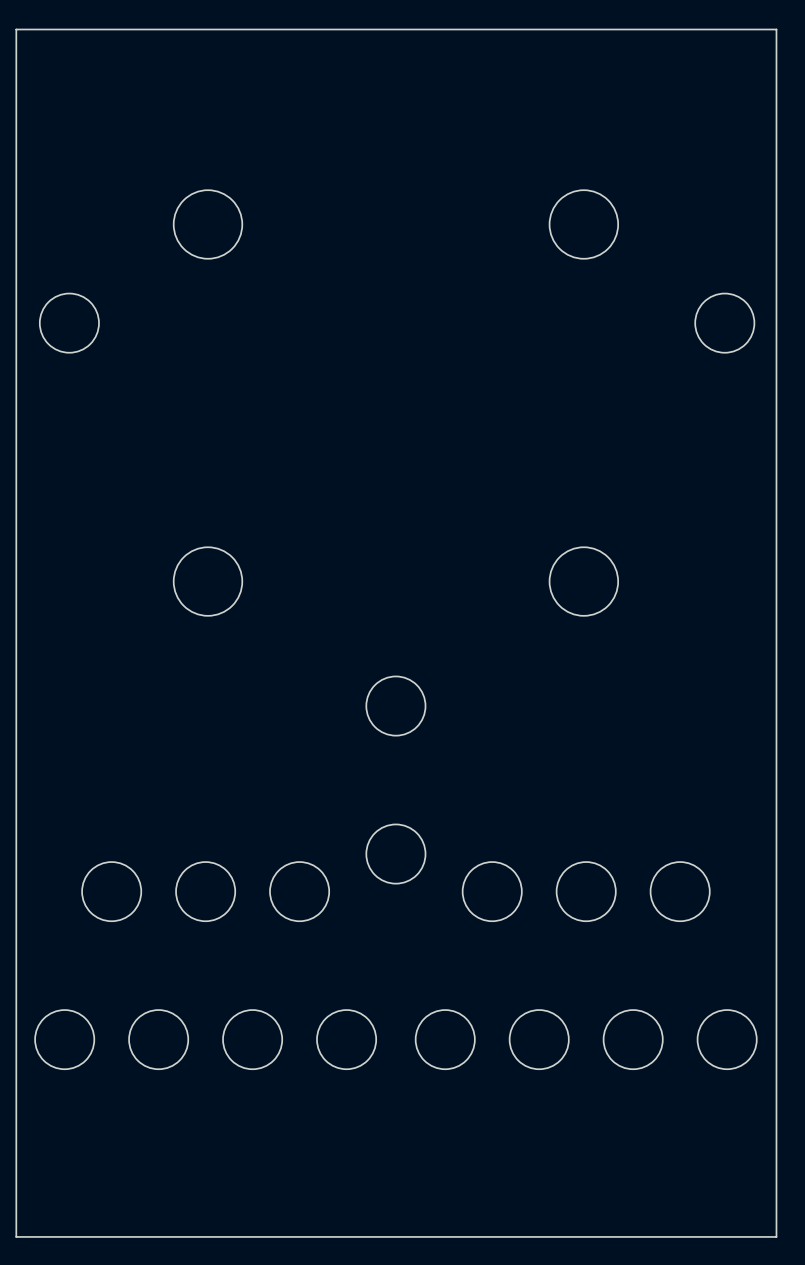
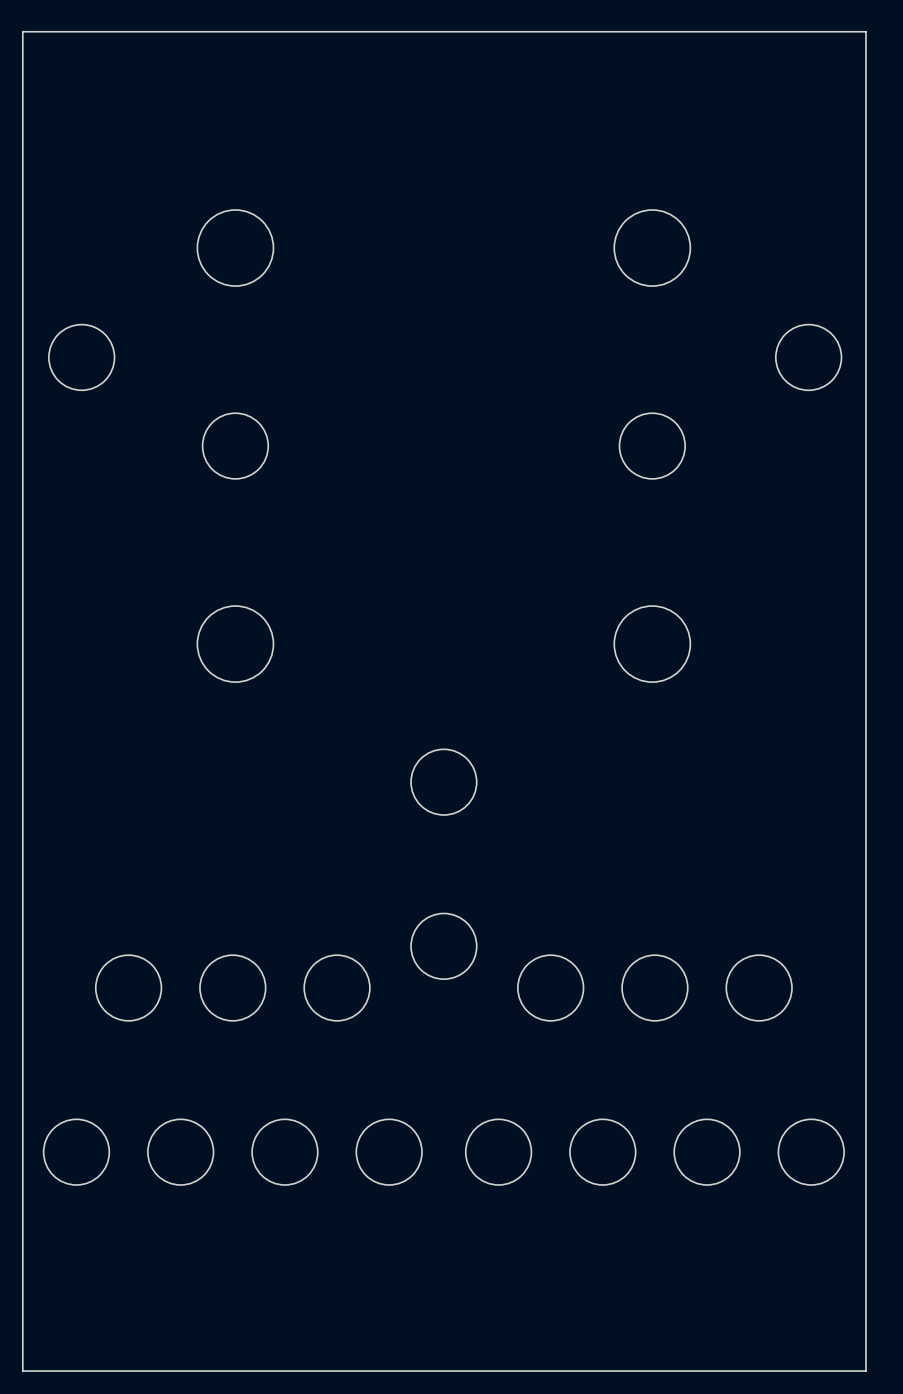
round board edge: none -> [202, 412, 269, 480]
round board edge: none -> [618, 412, 686, 480]

